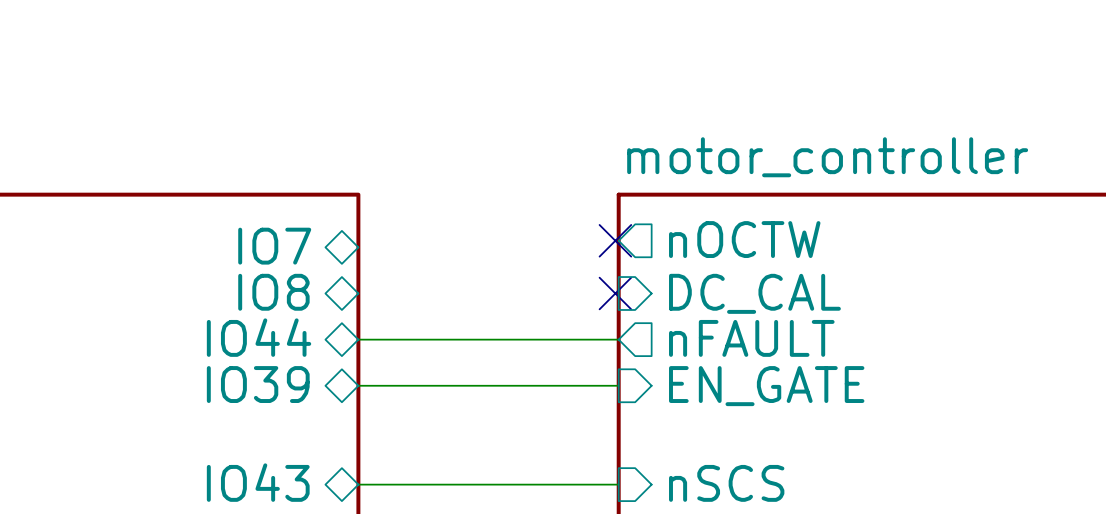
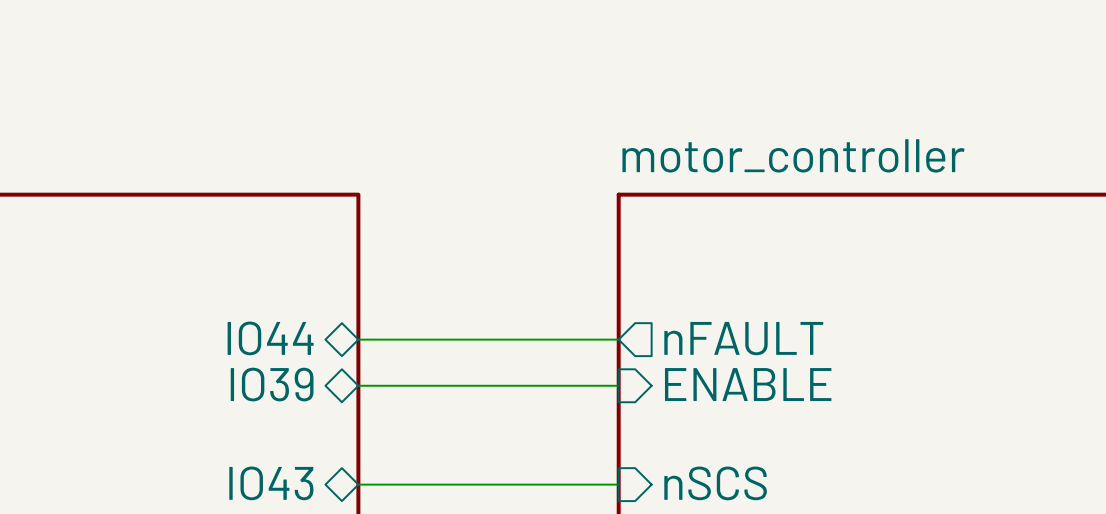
sheet pin: nOCTW (744, 239) -> none
no-connect mark: (615, 240) -> none
sheet pin: IO7 (274, 246) -> none
sheet pin: IO8 (273, 292) -> none
no-connect mark: (615, 293) -> none
sheet pin: DC_CAL (754, 293) -> none
sheet pin: EN_GATE (766, 386) -> ENABLE (748, 384)

